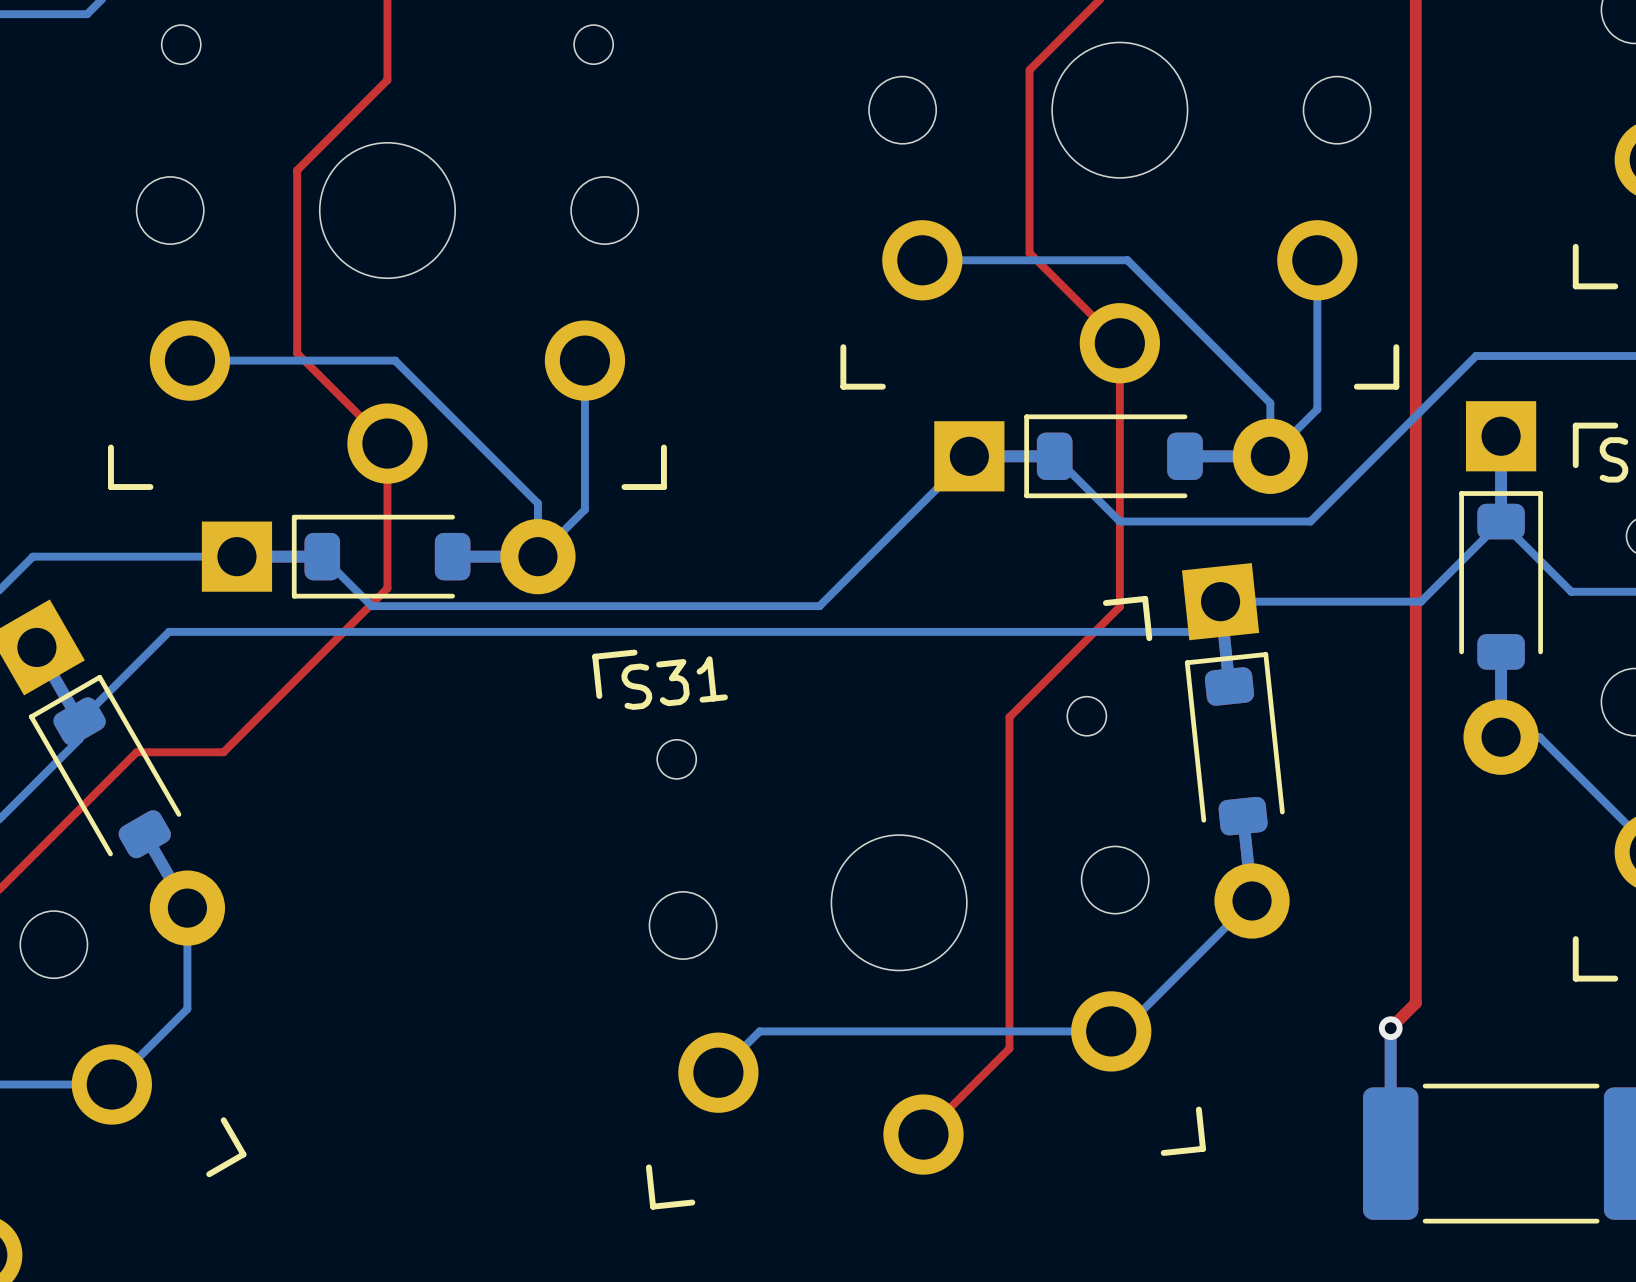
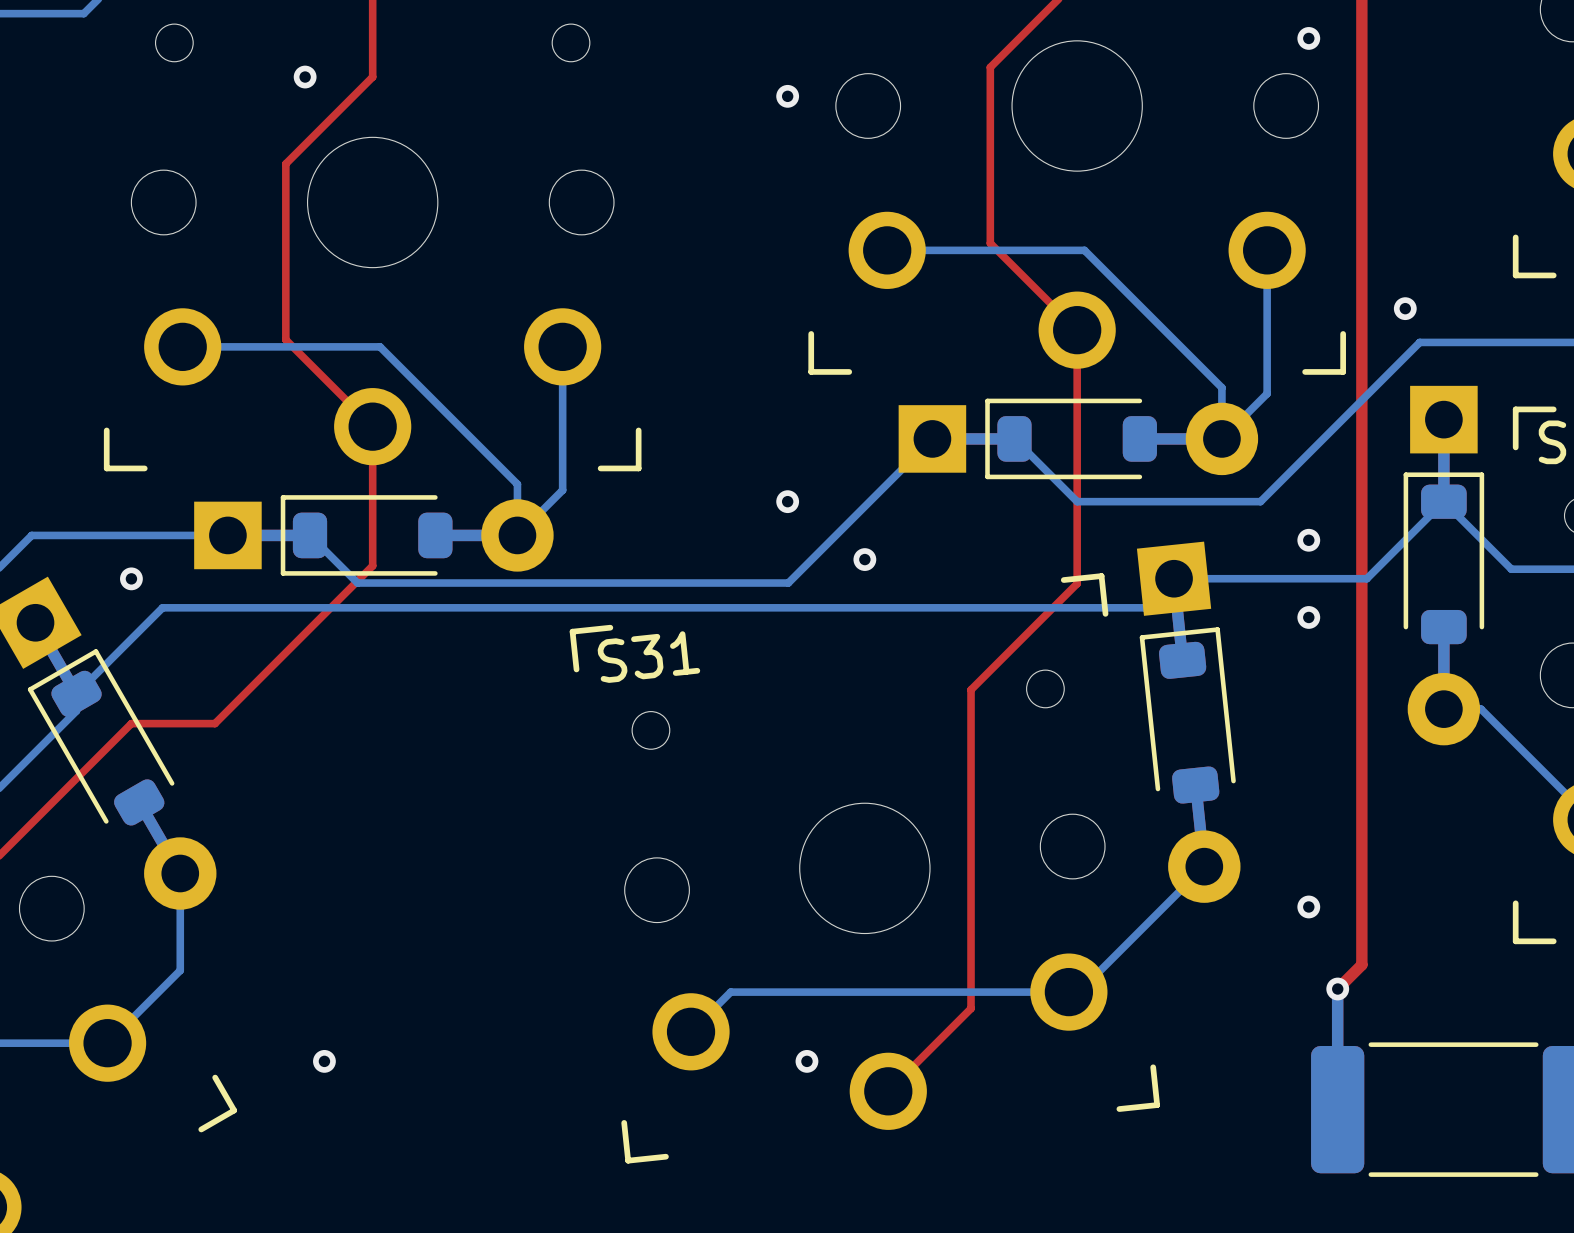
via: none -> (1308, 38)
via: none -> (305, 77)
via: none -> (787, 96)
via: none -> (1405, 308)
via: none -> (787, 501)
via: none -> (1308, 540)
via: none -> (864, 559)
via: none -> (131, 578)
via: none -> (1308, 617)
via: none -> (1308, 906)
via: none -> (324, 1061)
via: none -> (806, 1061)

